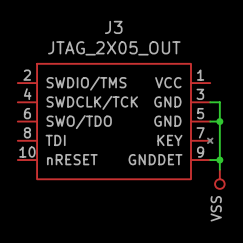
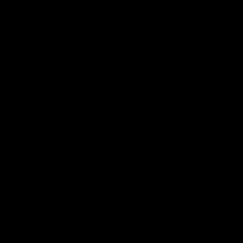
wire: (210, 102) (219, 102) (219, 169) -> none
J3: JTAG_2X05_OUT (115, 121) -> none
wire: (210, 121) (219, 121) -> none
junction: (219, 121) -> none
wire: (210, 160) (219, 160) -> none
junction: (219, 160) -> none
power symbol: VSS (219, 179) -> none

